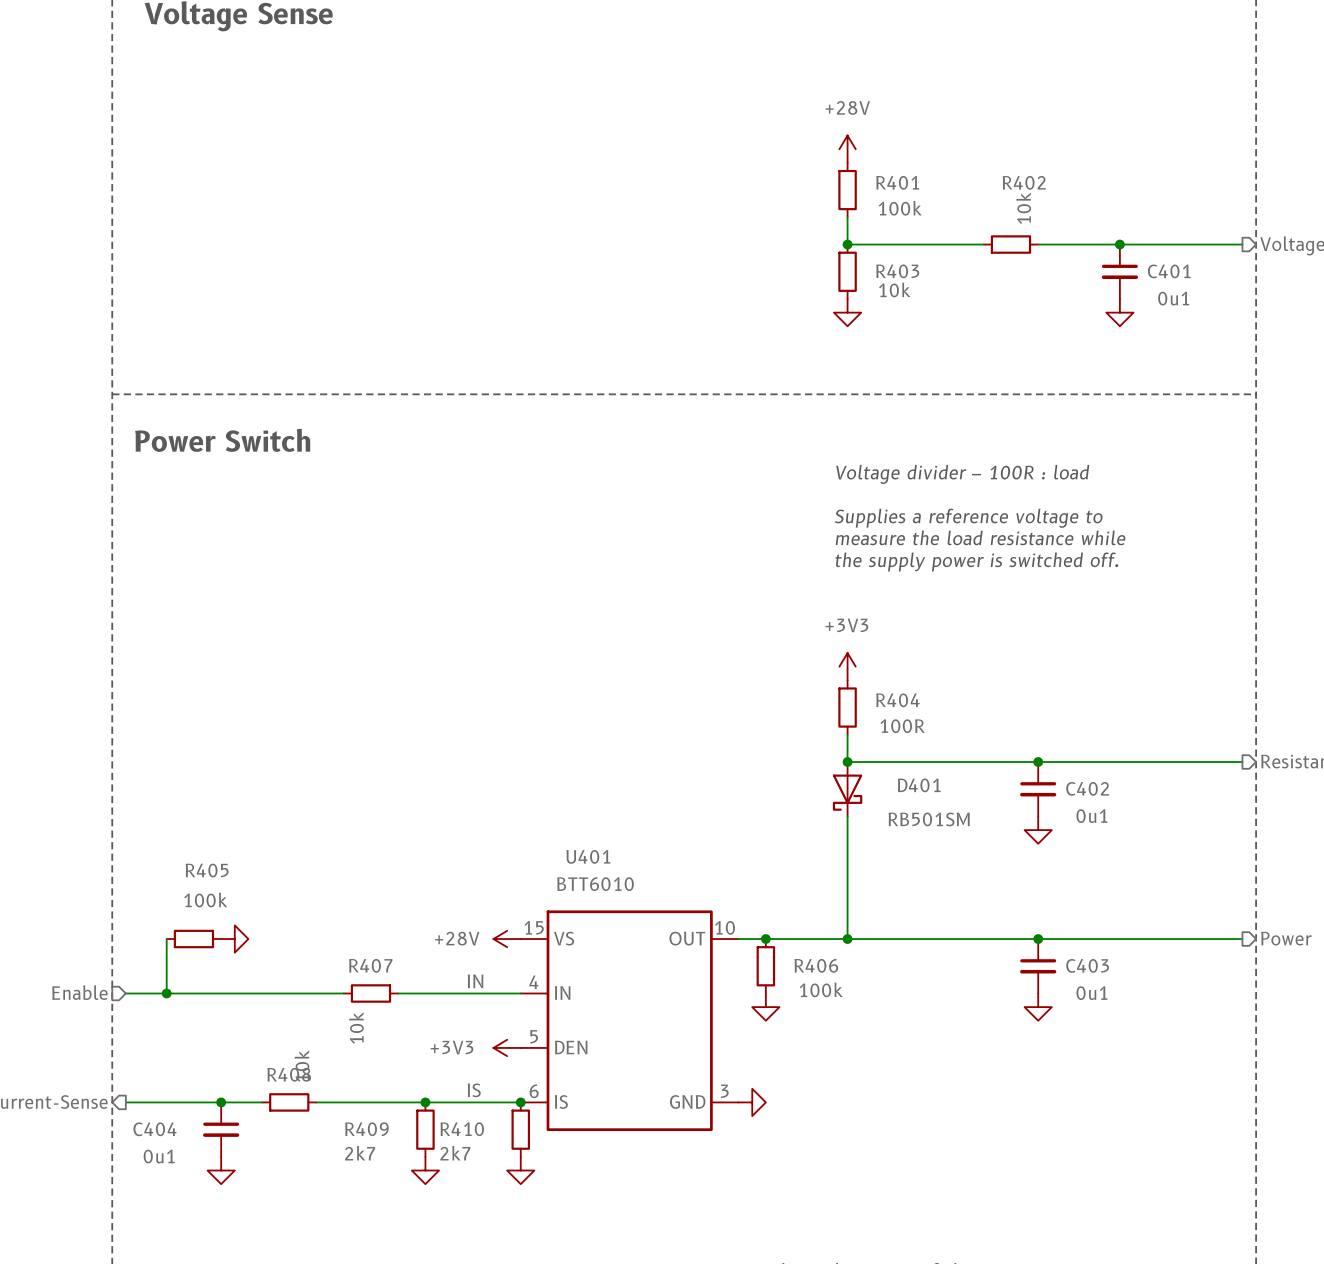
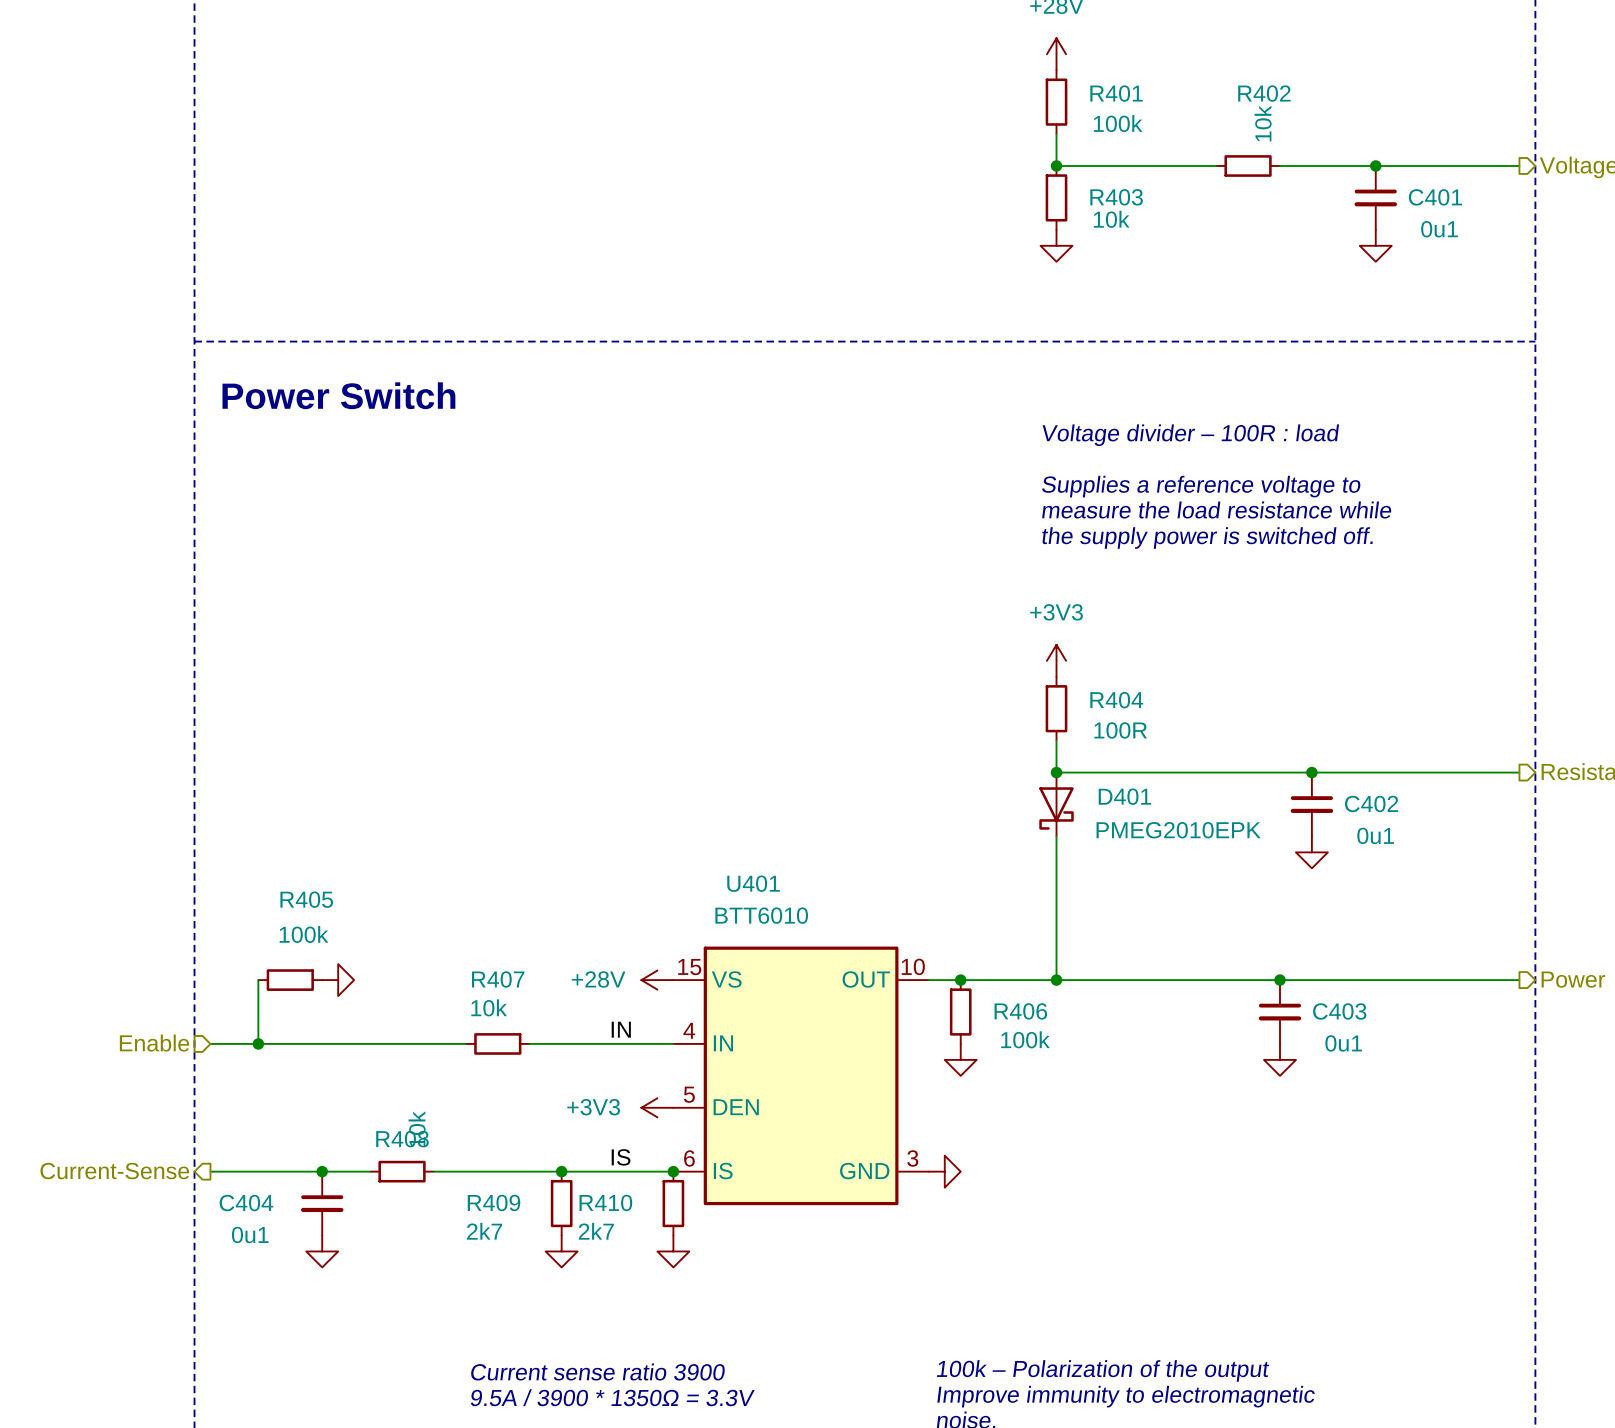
junction position: (1038, 762) -> (1311, 772)
D401 name position: D401 (919, 785) -> D401 (1124, 796)
C402 position: (1038, 789) -> (1311, 804)
D401 value: RB501SM (929, 819) -> PMEG2010EPK (1178, 830)
power symbol position: (1038, 830) -> (1311, 852)
R407 name position: R407 (370, 965) -> R407 (498, 979)
R407 value rotation: 0° (356, 1028) -> 90° clockwise (489, 1007)
R407 value position: 10k (356, 1028) -> 10k (489, 1007)

